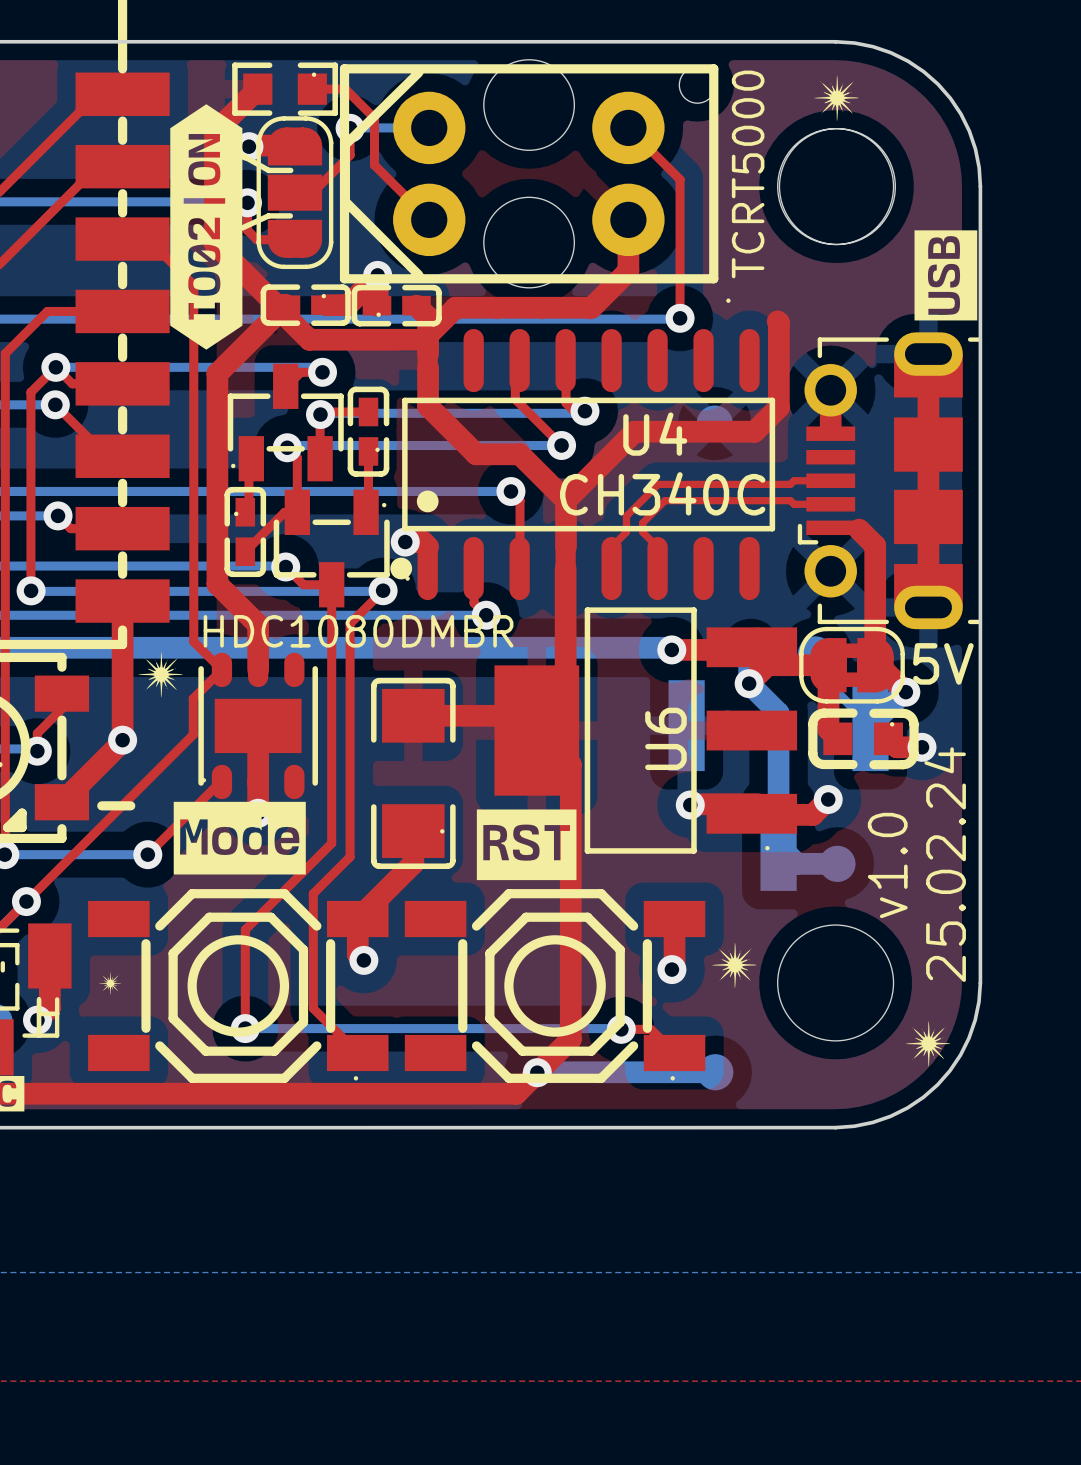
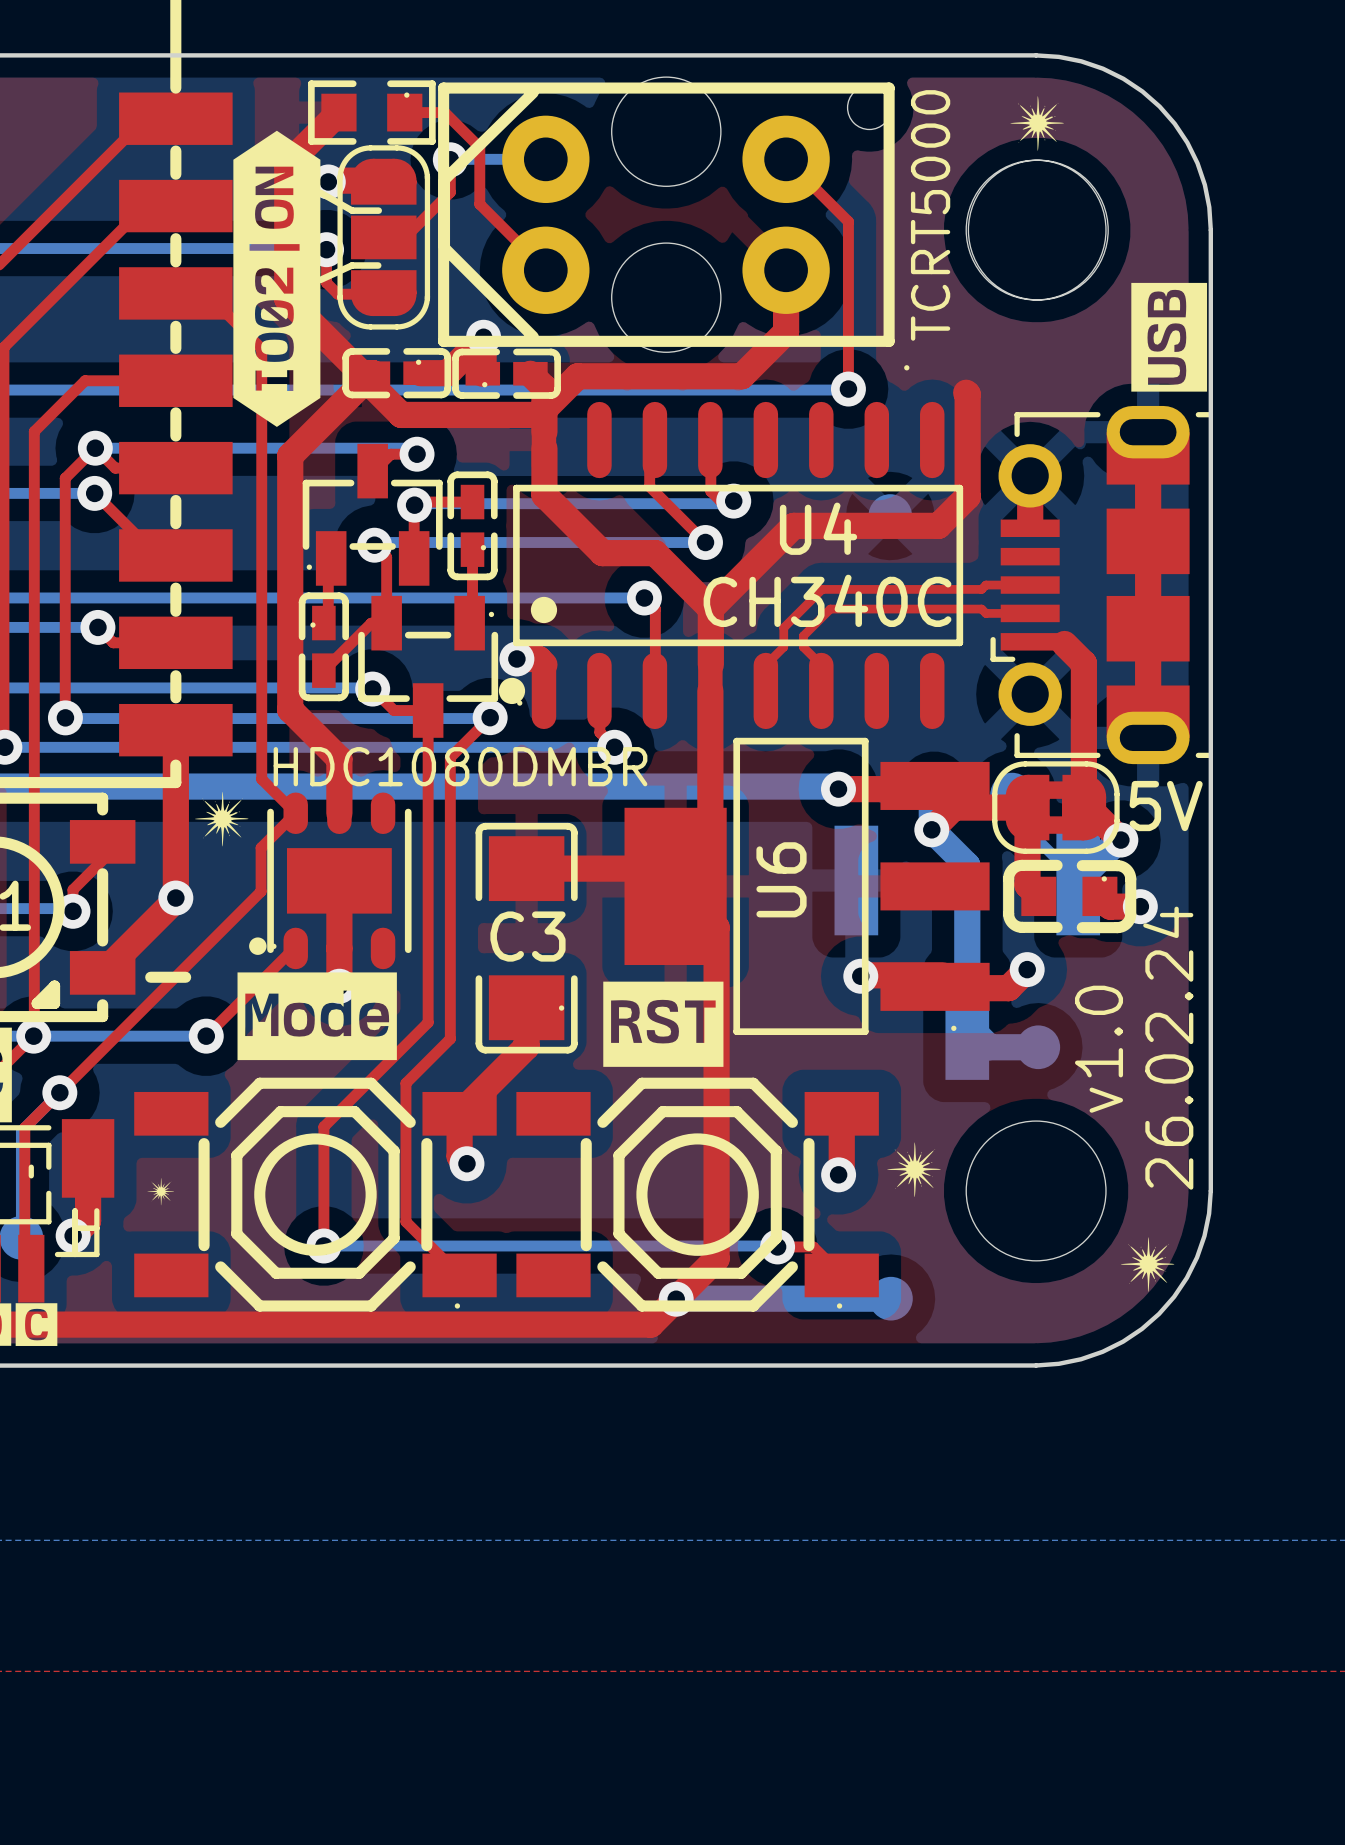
part footprint: [198, 652, 318, 818] -> [249, 792, 412, 970]
U6 name position: U6 (665, 738) -> U6 (781, 879)
C3 name: none -> C3 (527, 936)
text: 25.02.24 (945, 864) -> 26.02.24 (1168, 1048)

